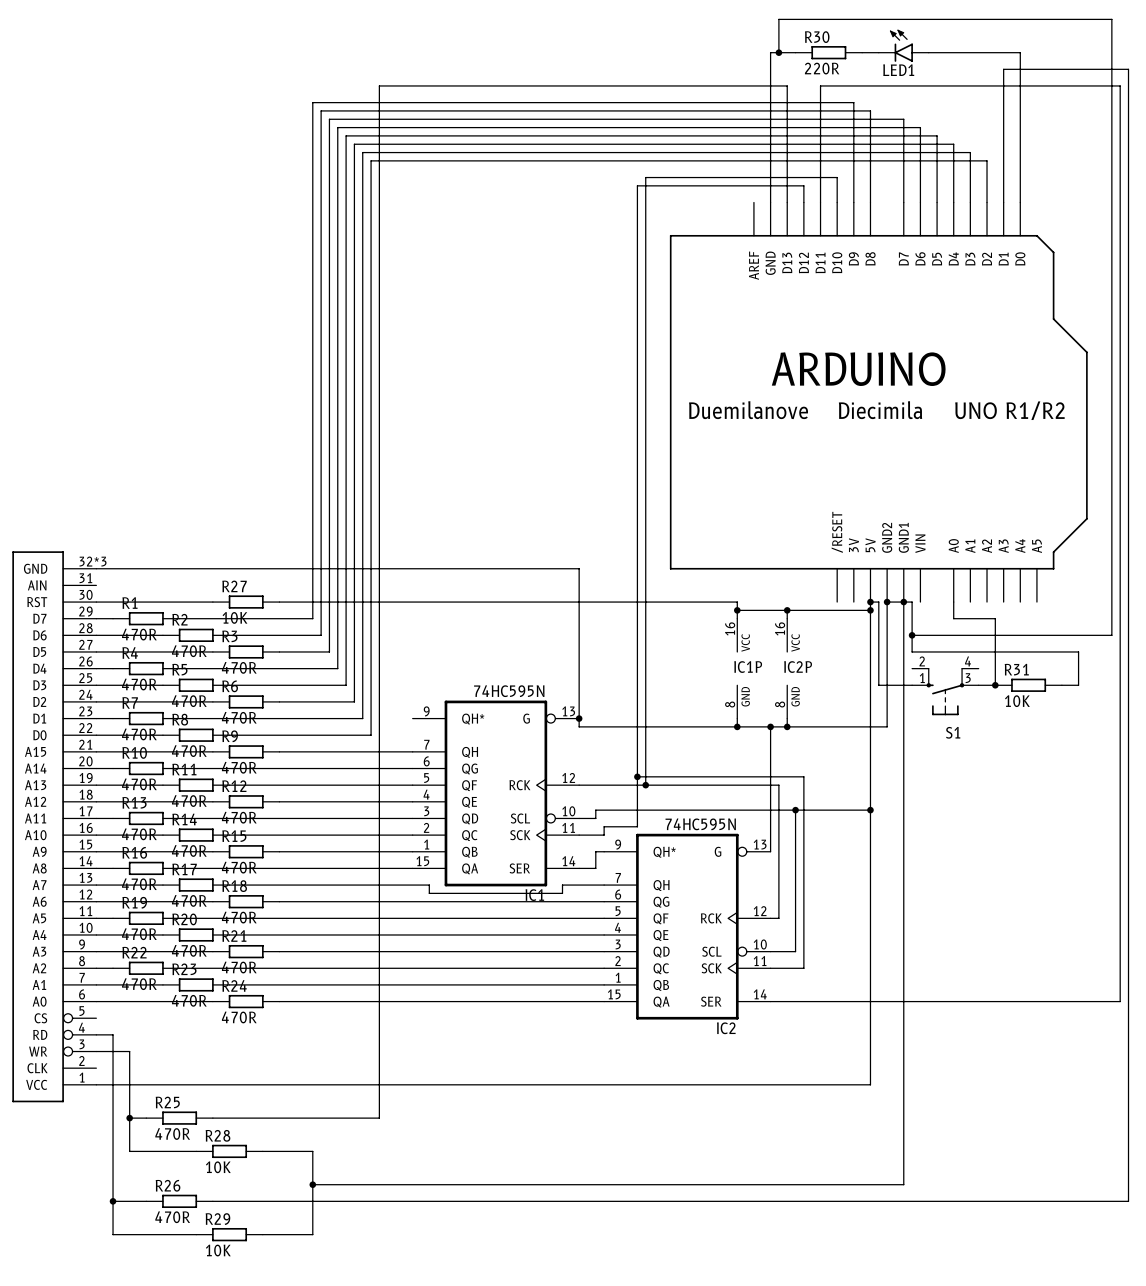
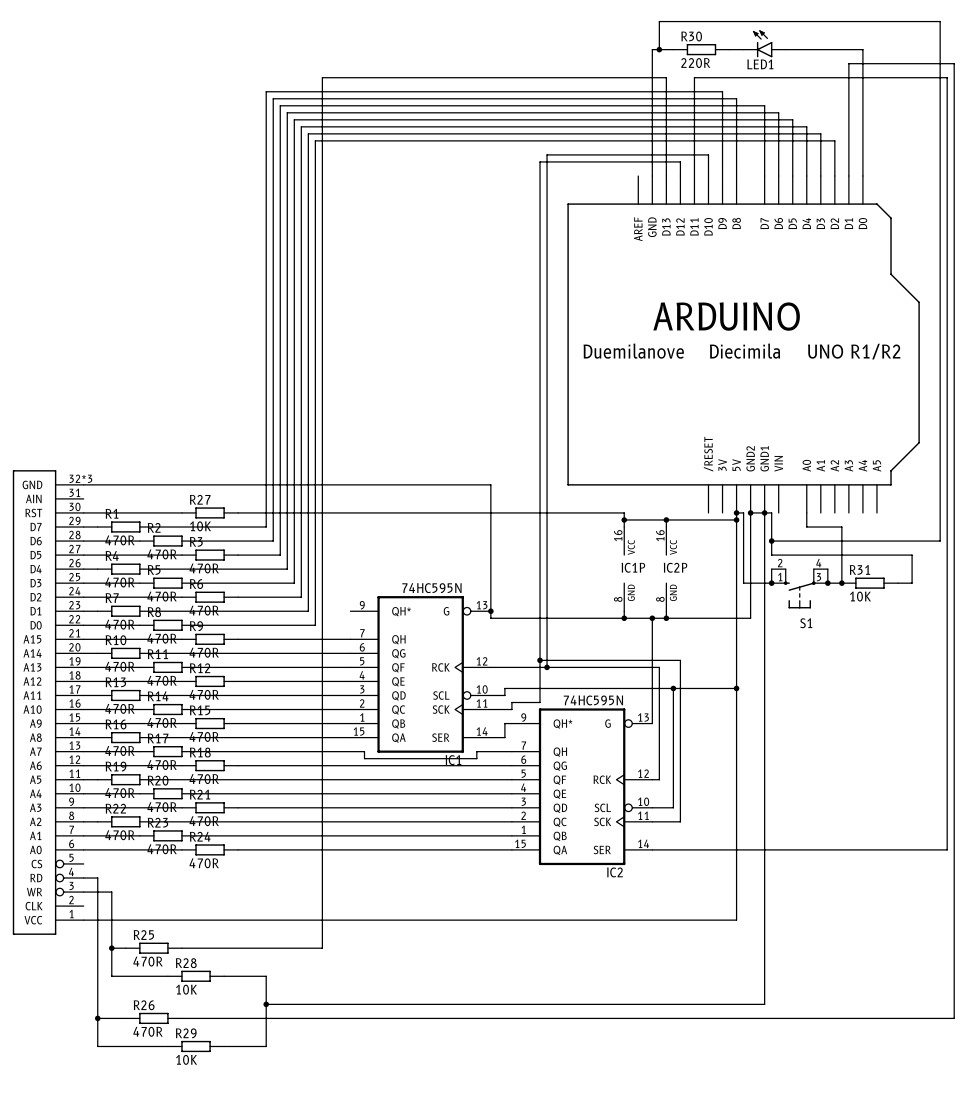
wire: none -> (771, 569) (771, 583)
wire: none -> (827, 569) (827, 583)
junction: none -> (771, 583)
junction: none -> (827, 583)

